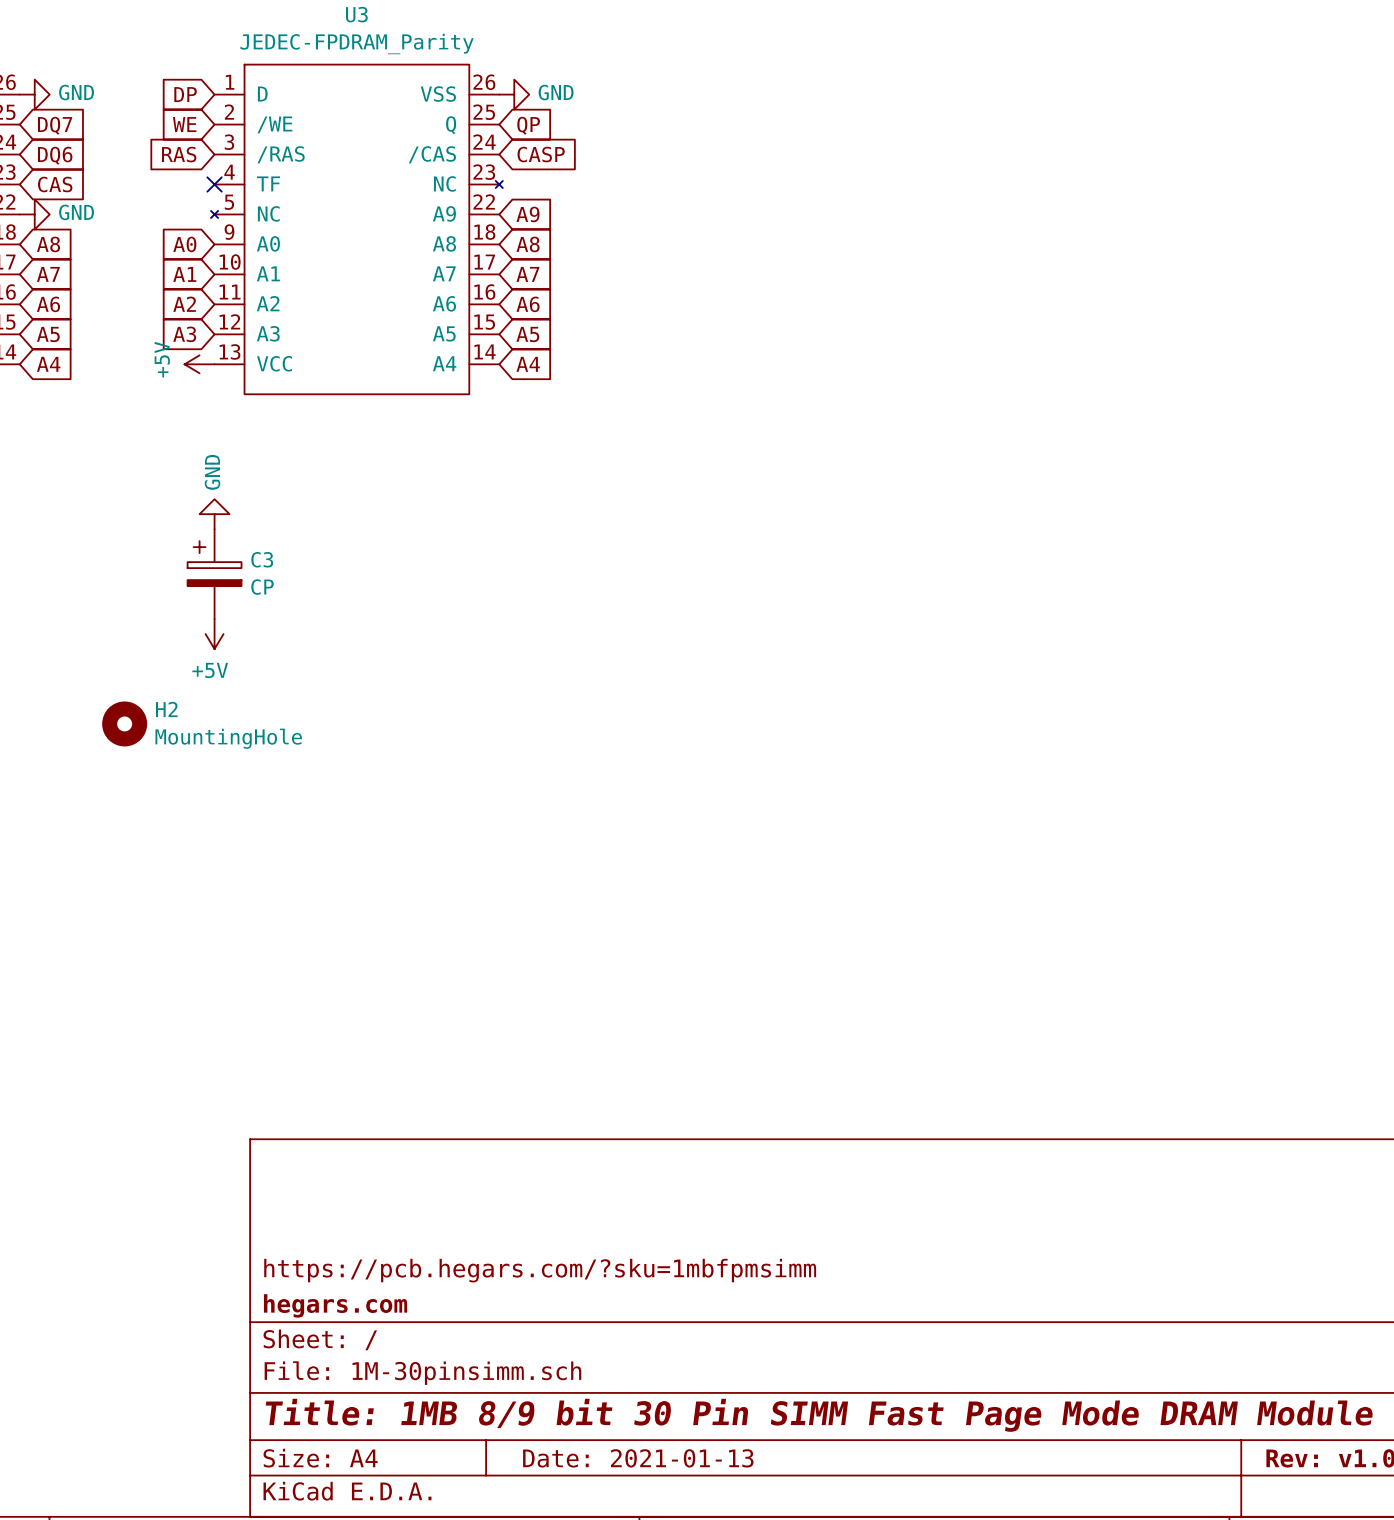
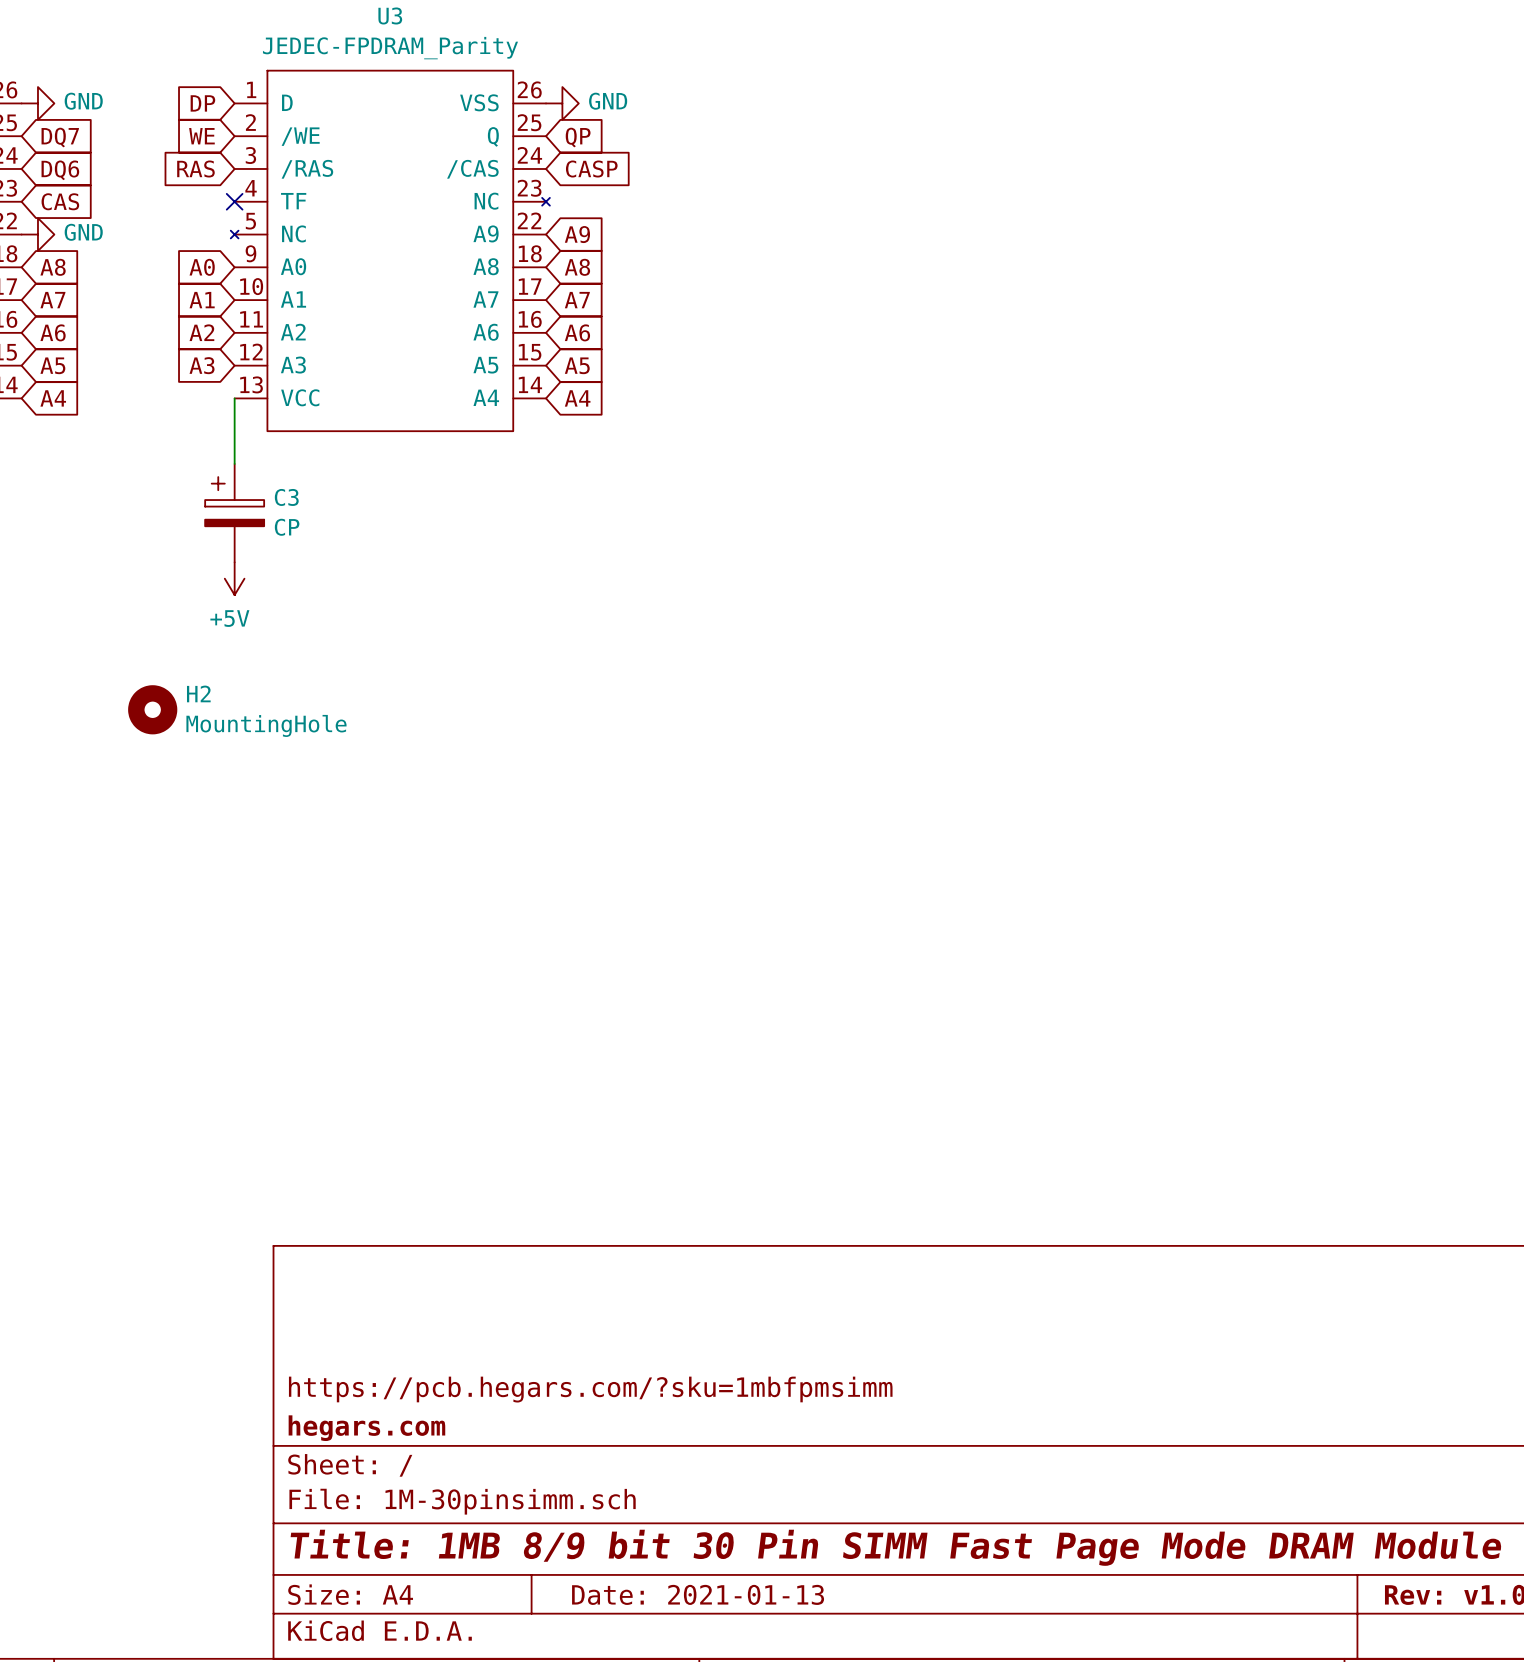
power symbol: +5V (199, 364) -> none
wire: none -> (234, 398) (234, 463)
power symbol: GND (214, 514) -> none
power symbol: none -> +5V (234, 578)
C3 position: (214, 574) -> (234, 513)
power symbol: +5V (214, 634) -> none
H2 position: (124, 723) -> (152, 709)

